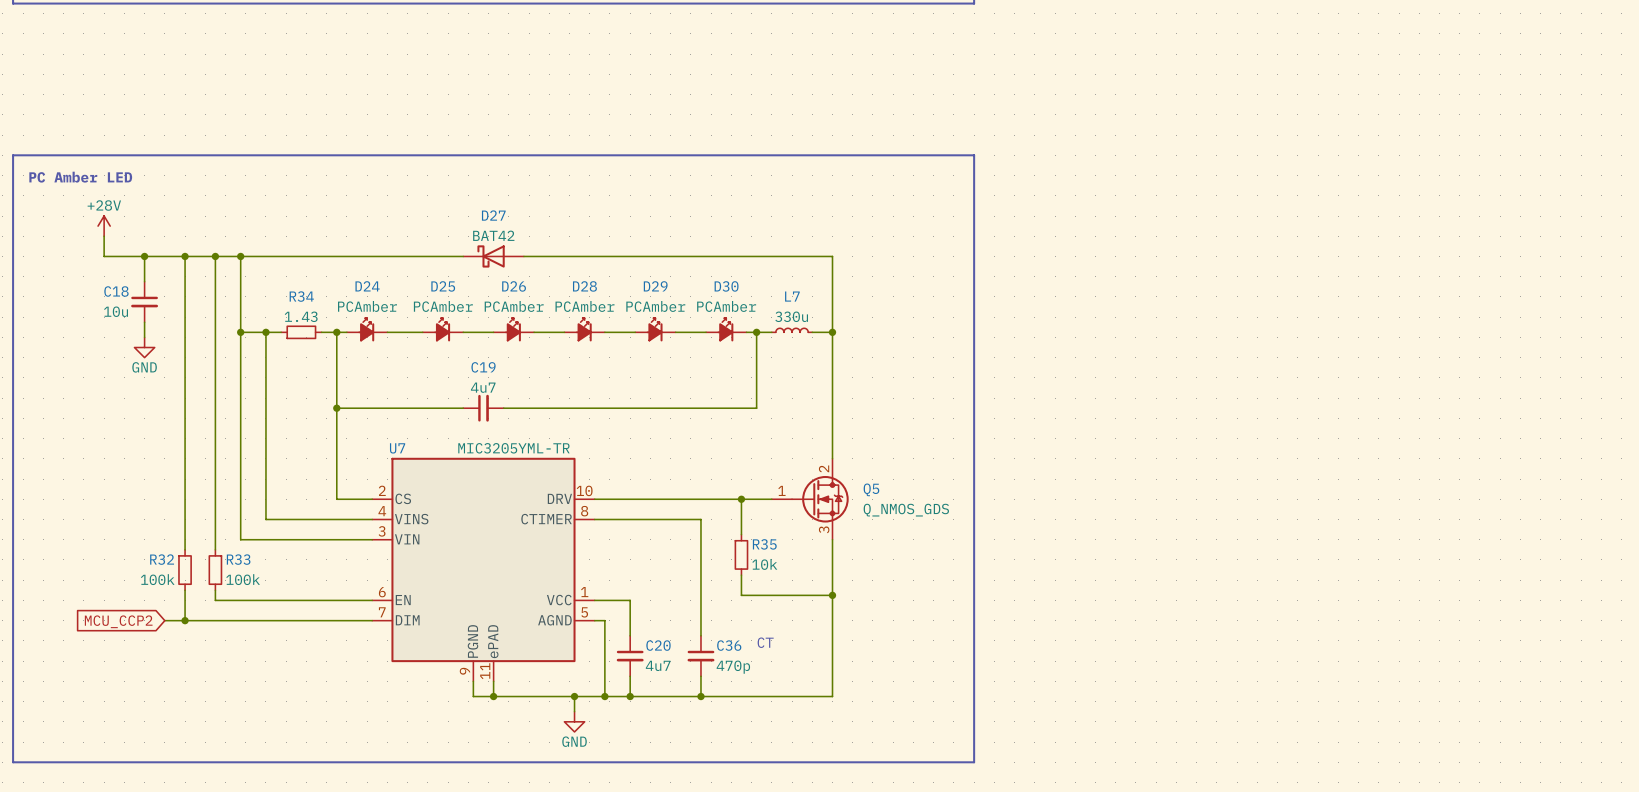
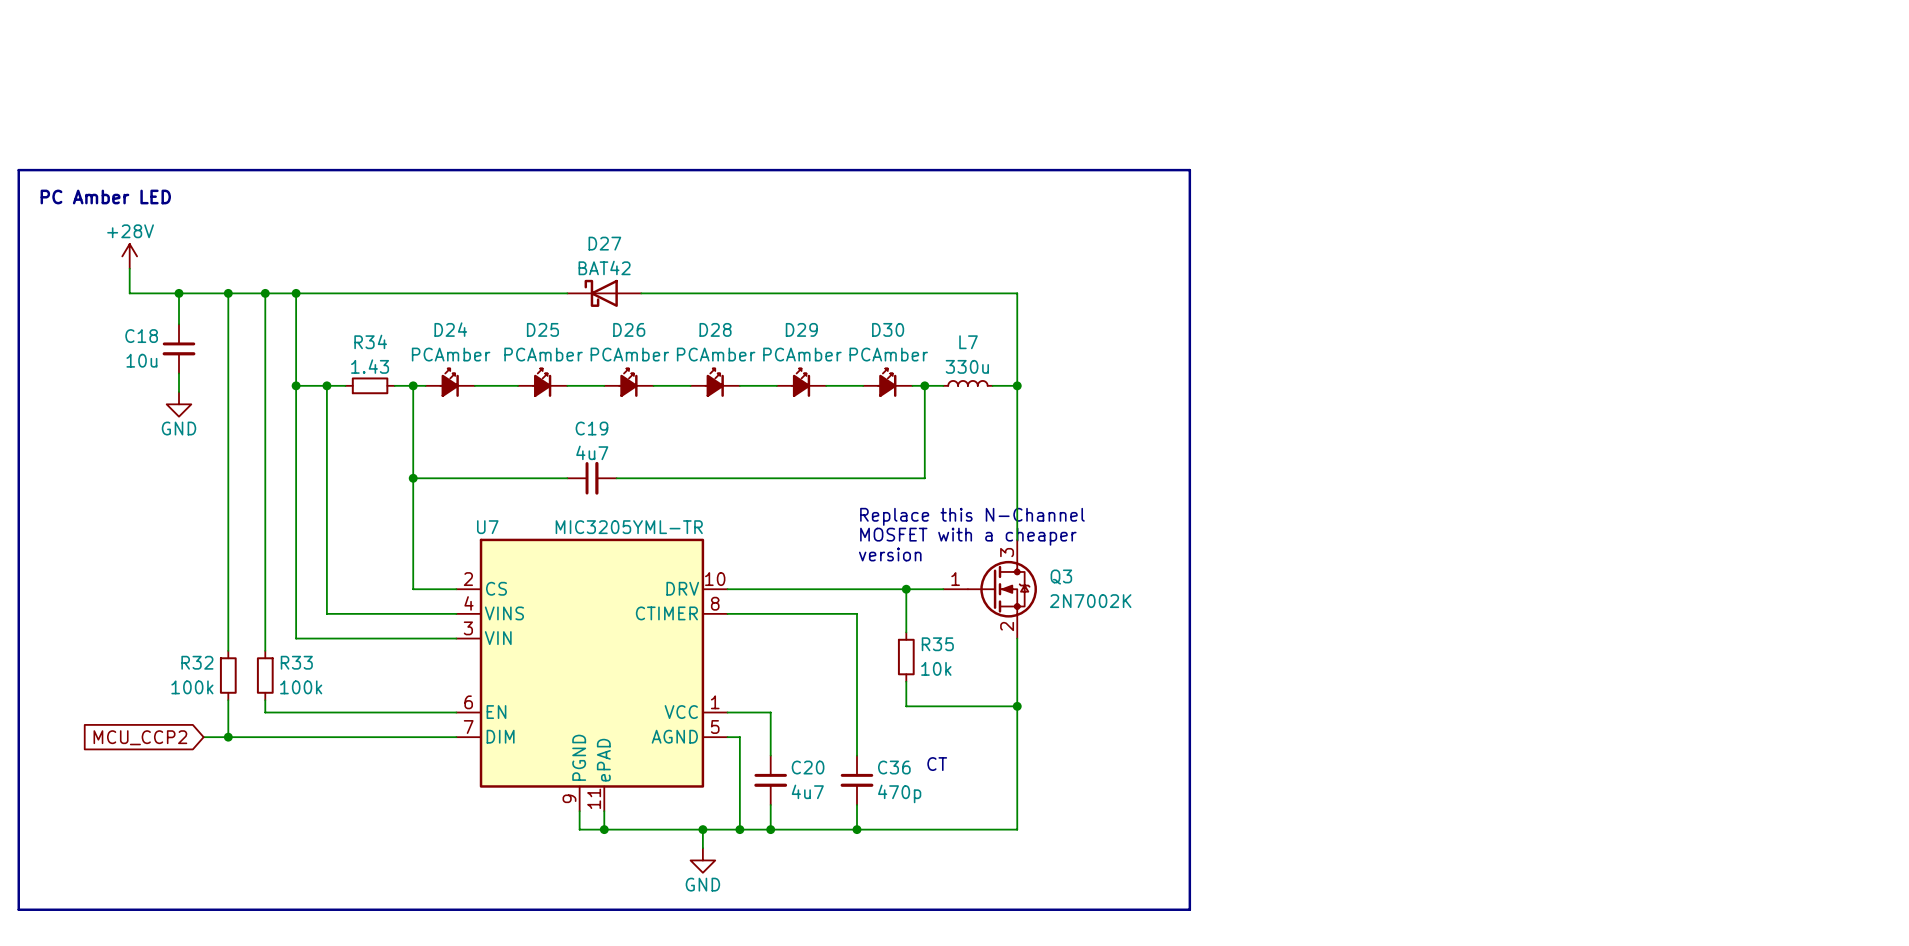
text: none -> Replace this N-Channel (972, 516)
text: none -> MOSFET with a cheaper (968, 536)
Q5 pin number: 2 (824, 468) -> 3 (1007, 552)
text: none -> version (890, 554)
Q5 name: Q5 (871, 489) -> Q3 (1061, 577)
Q5 value: Q_NMOS_GDS (906, 510) -> 2N7002K (1090, 601)
Q5 pin number: 3 (824, 529) -> 2 (1007, 626)

